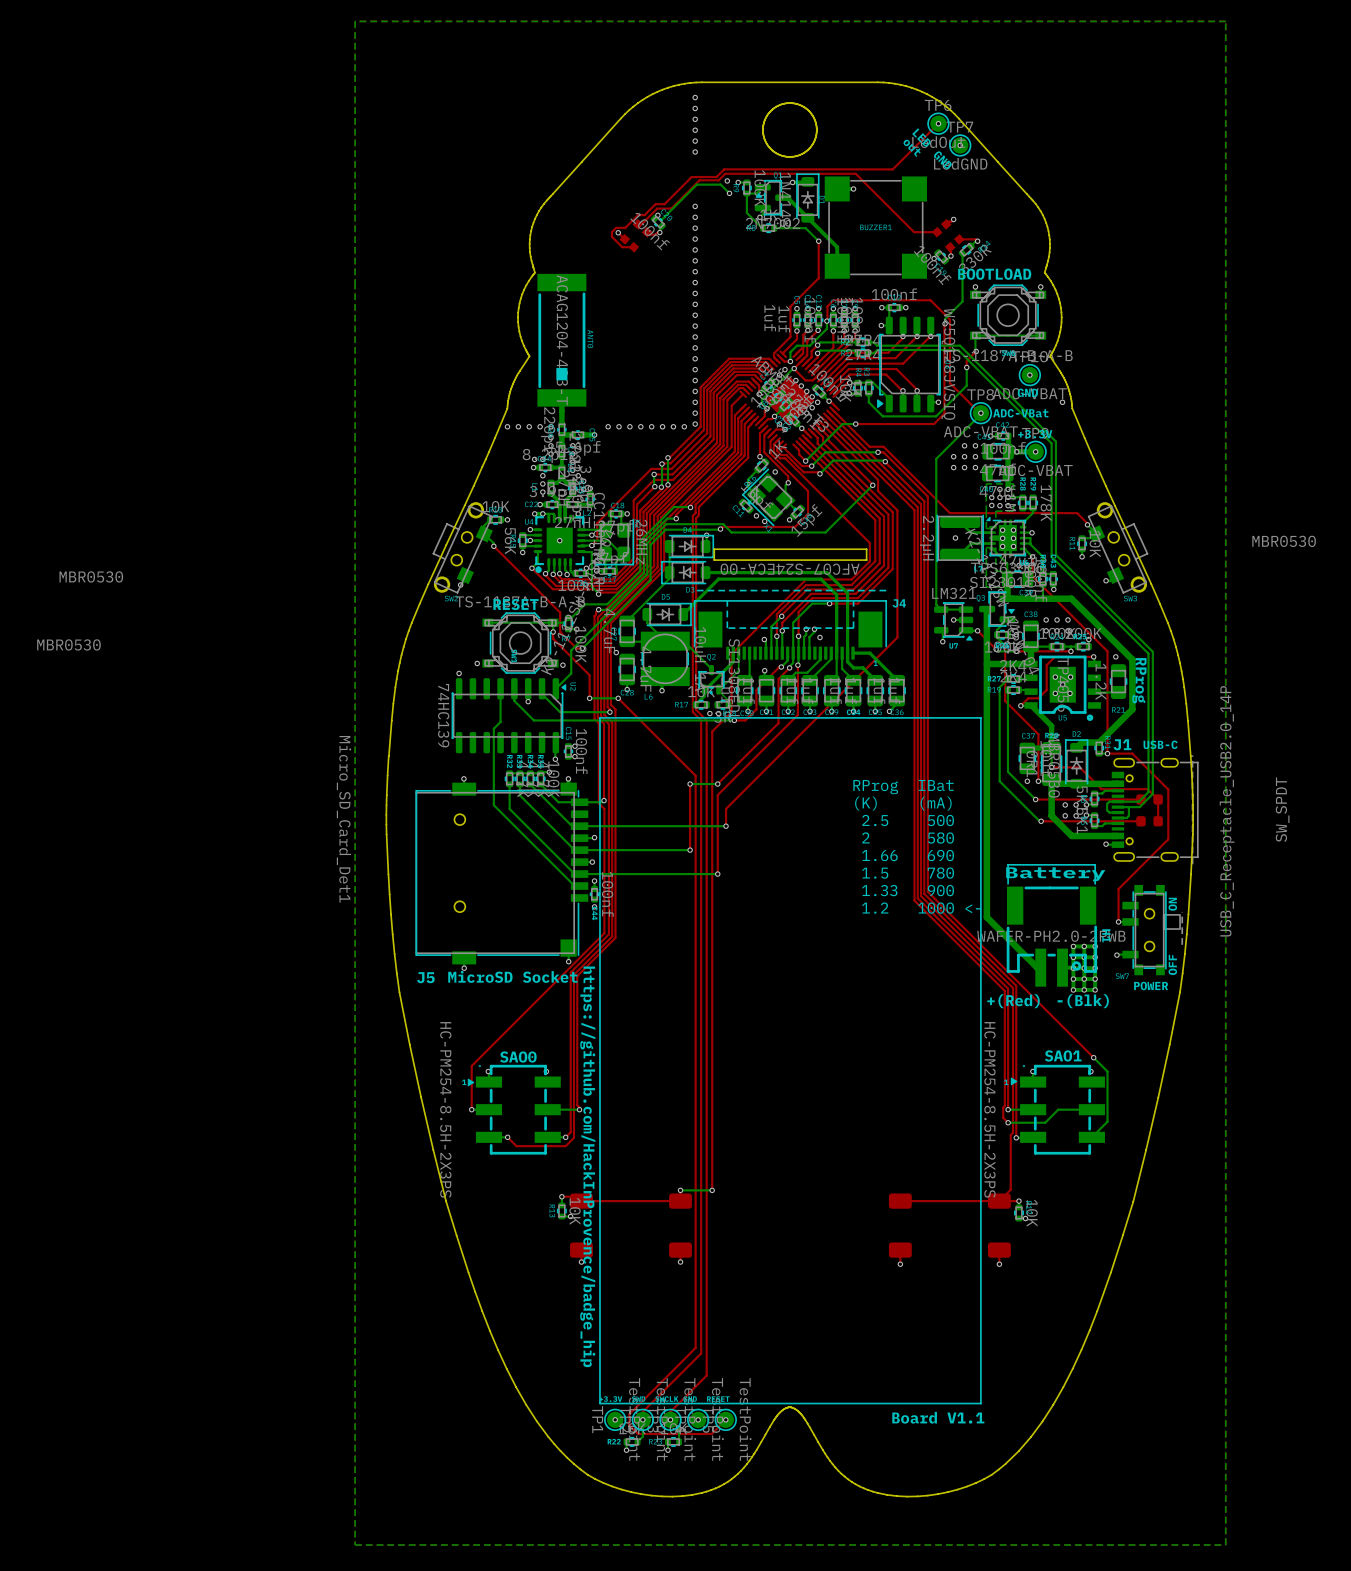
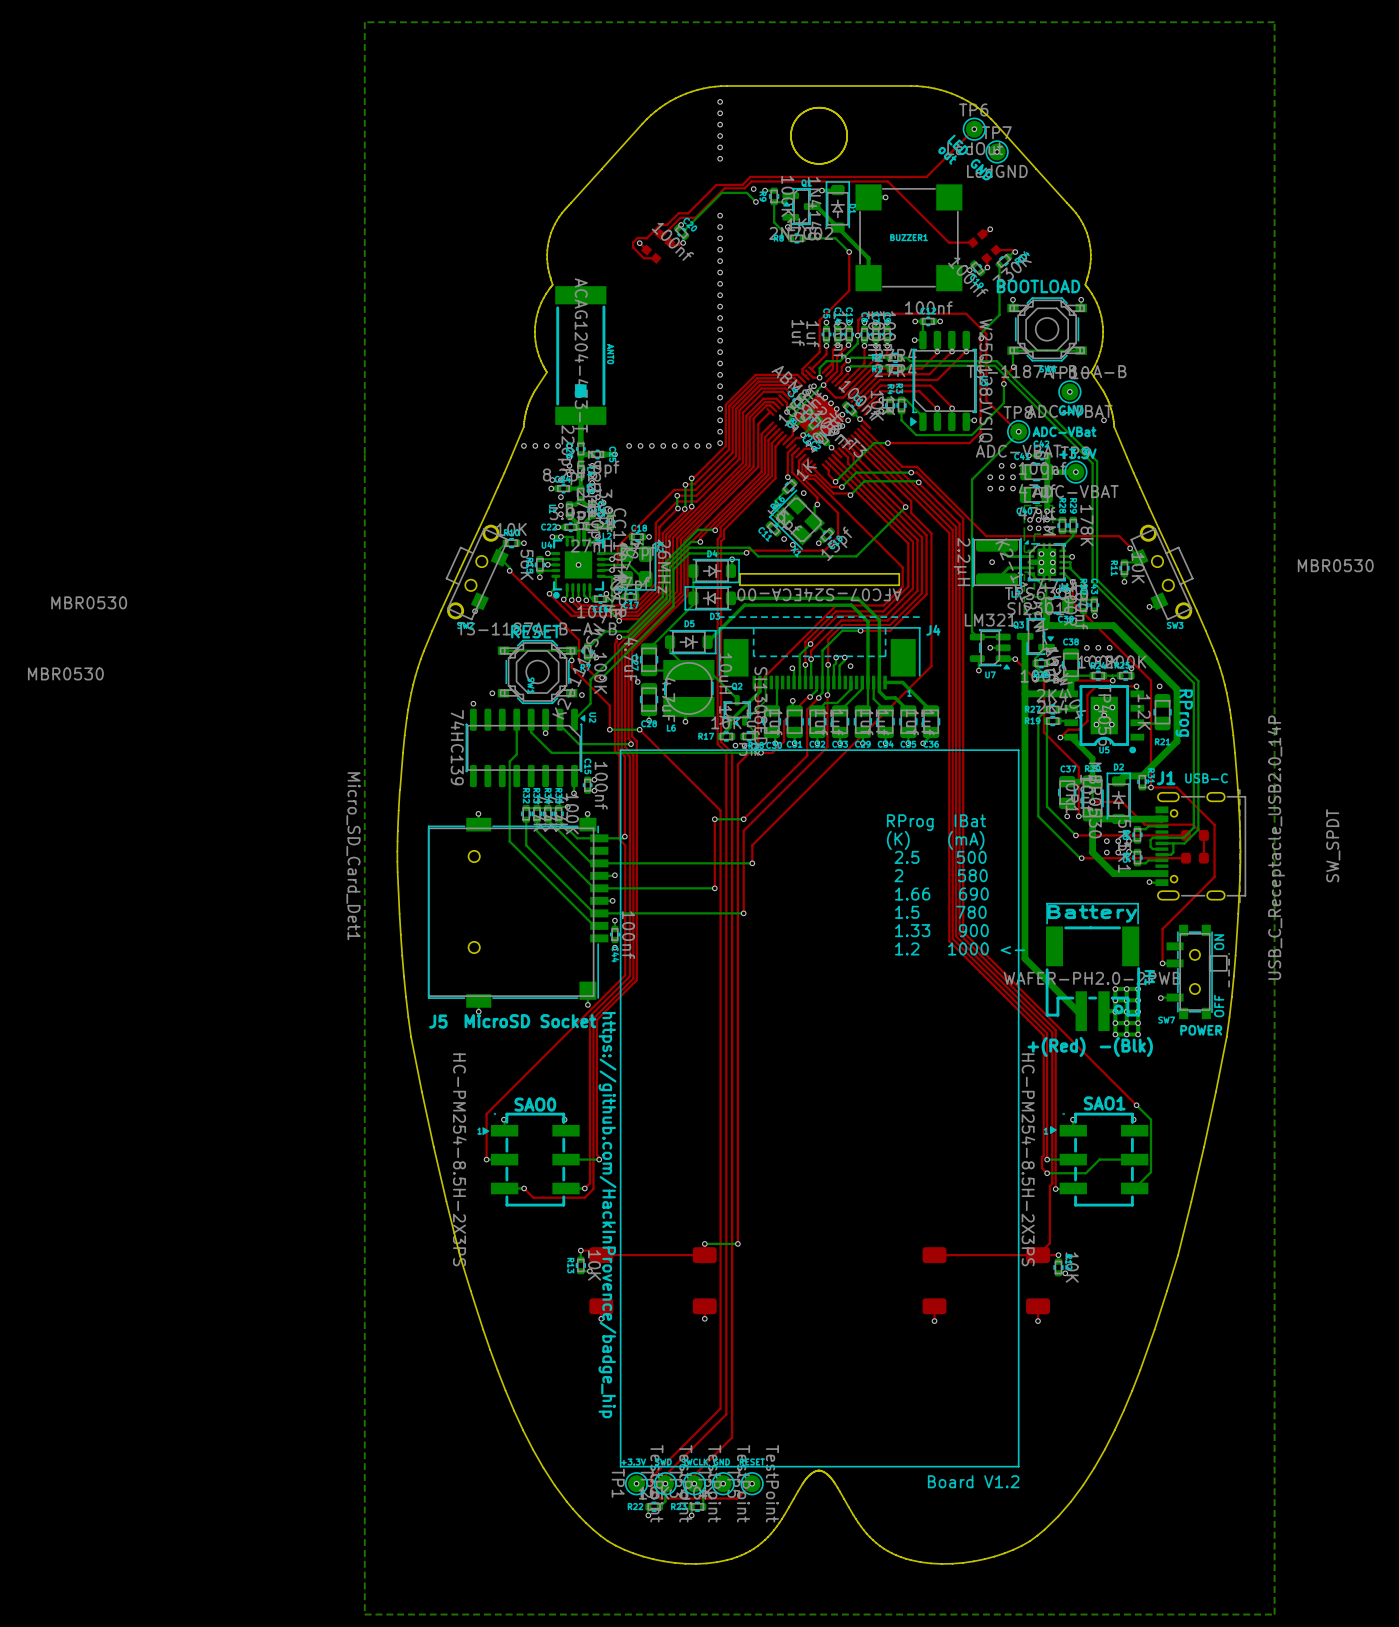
text: Board V1.1 (938, 1417) -> Board V1.2 (973, 1481)

